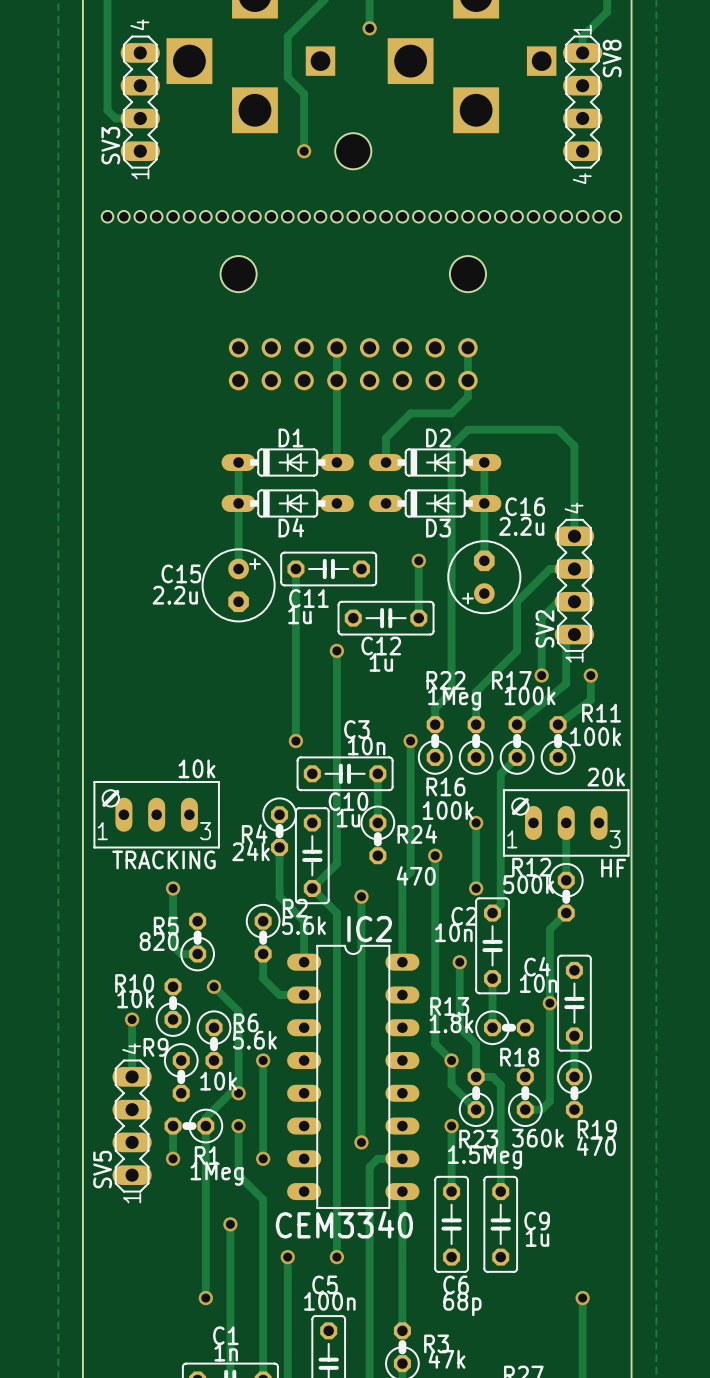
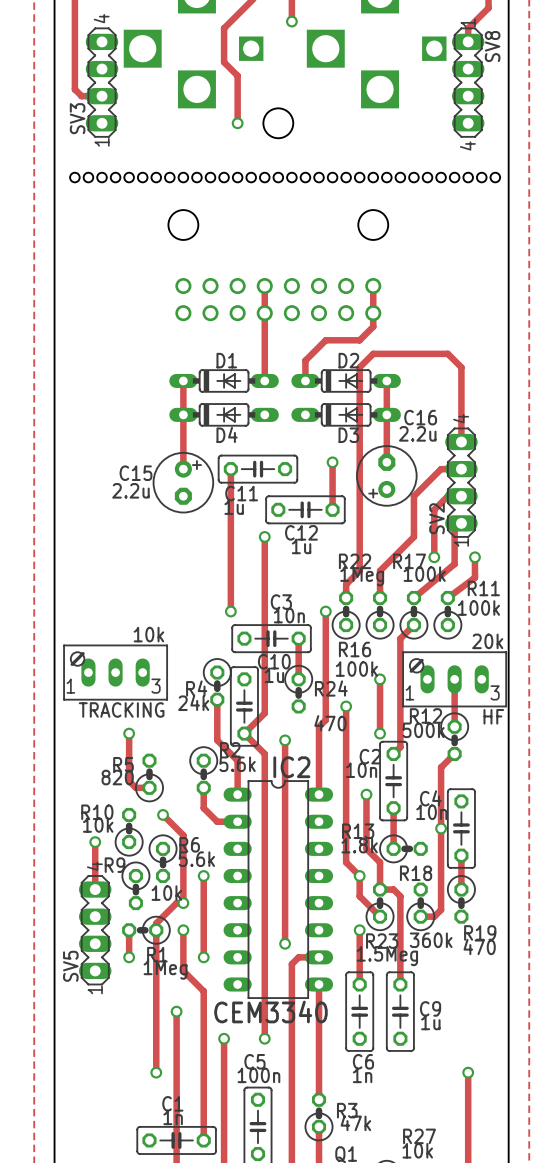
C6 value: 68p (462, 1304) -> 1n (362, 1075)

